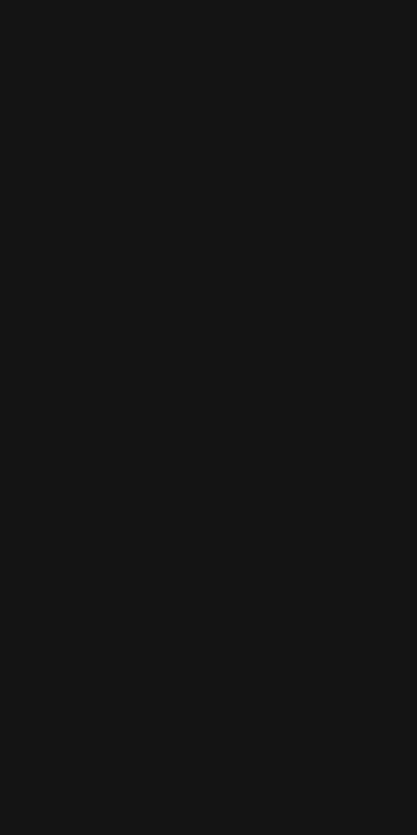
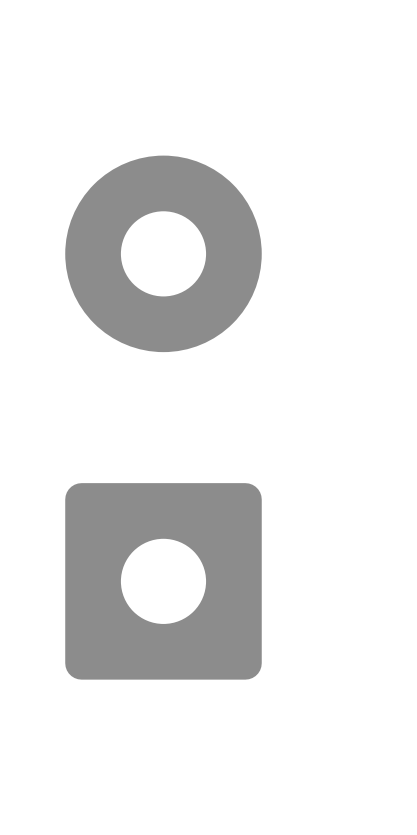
part: none -> (163, 417)

